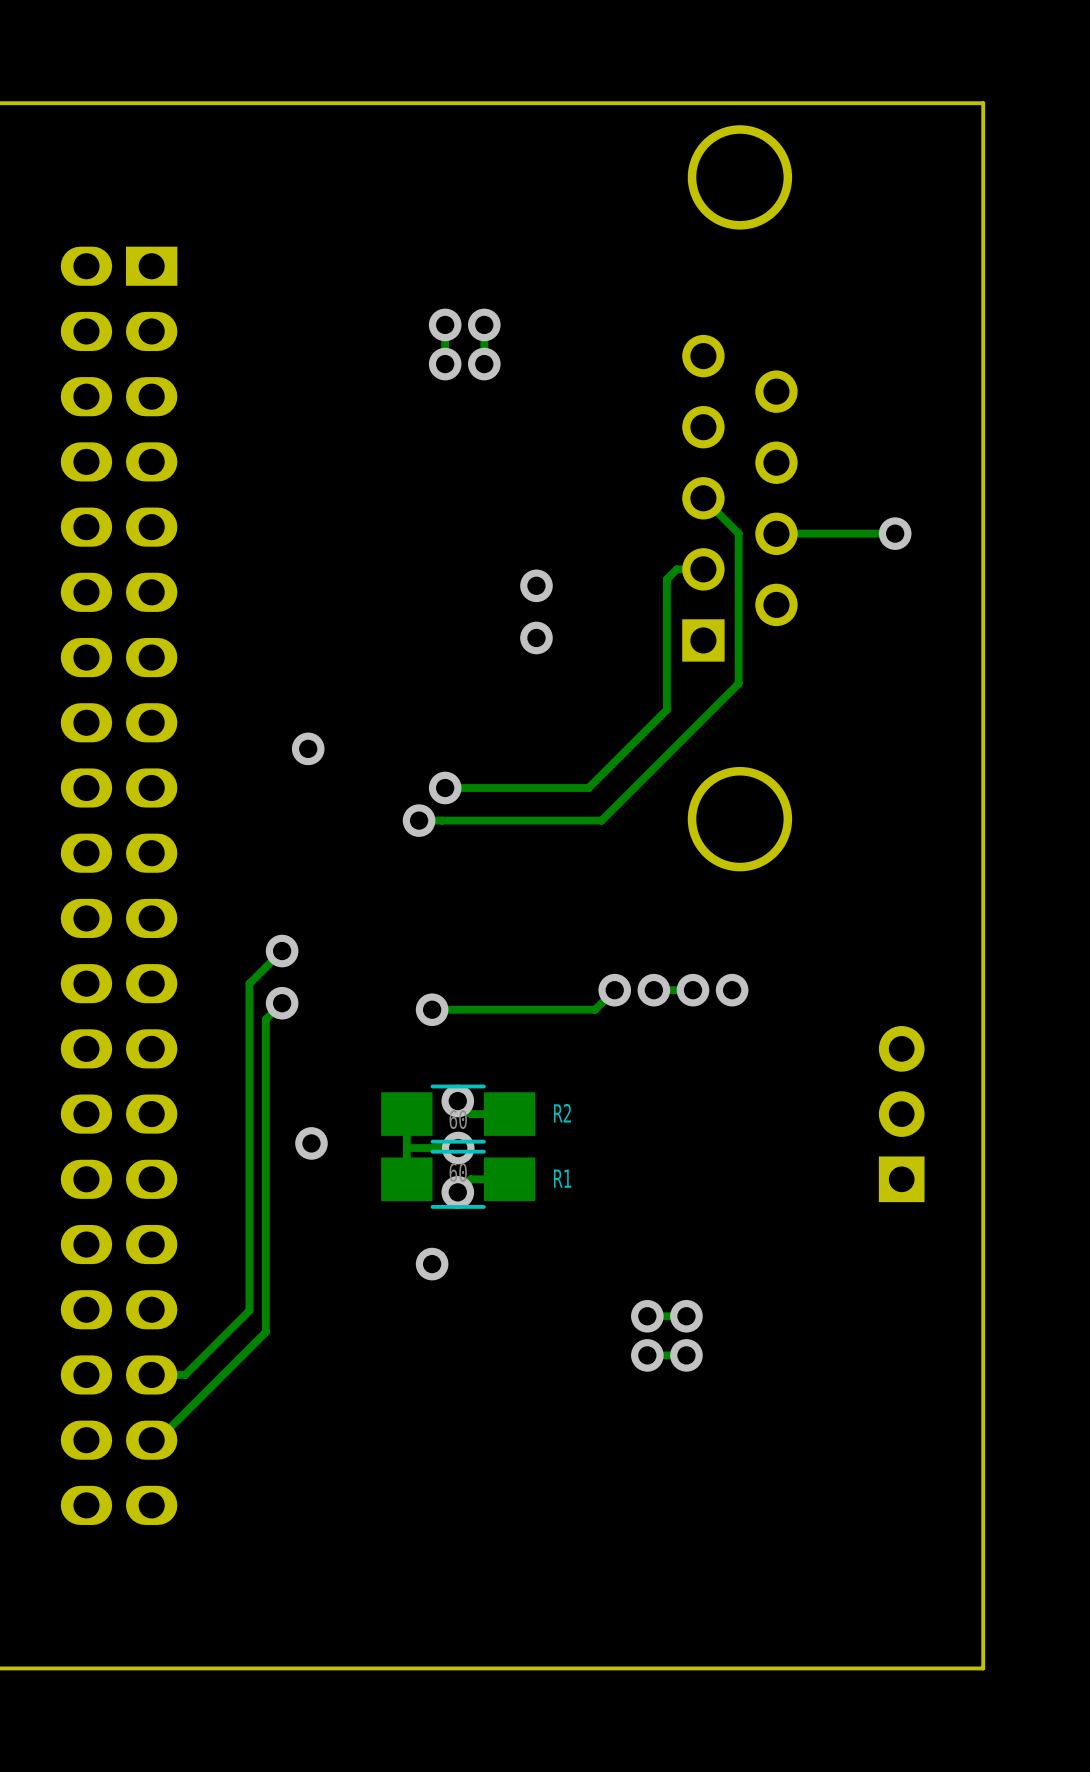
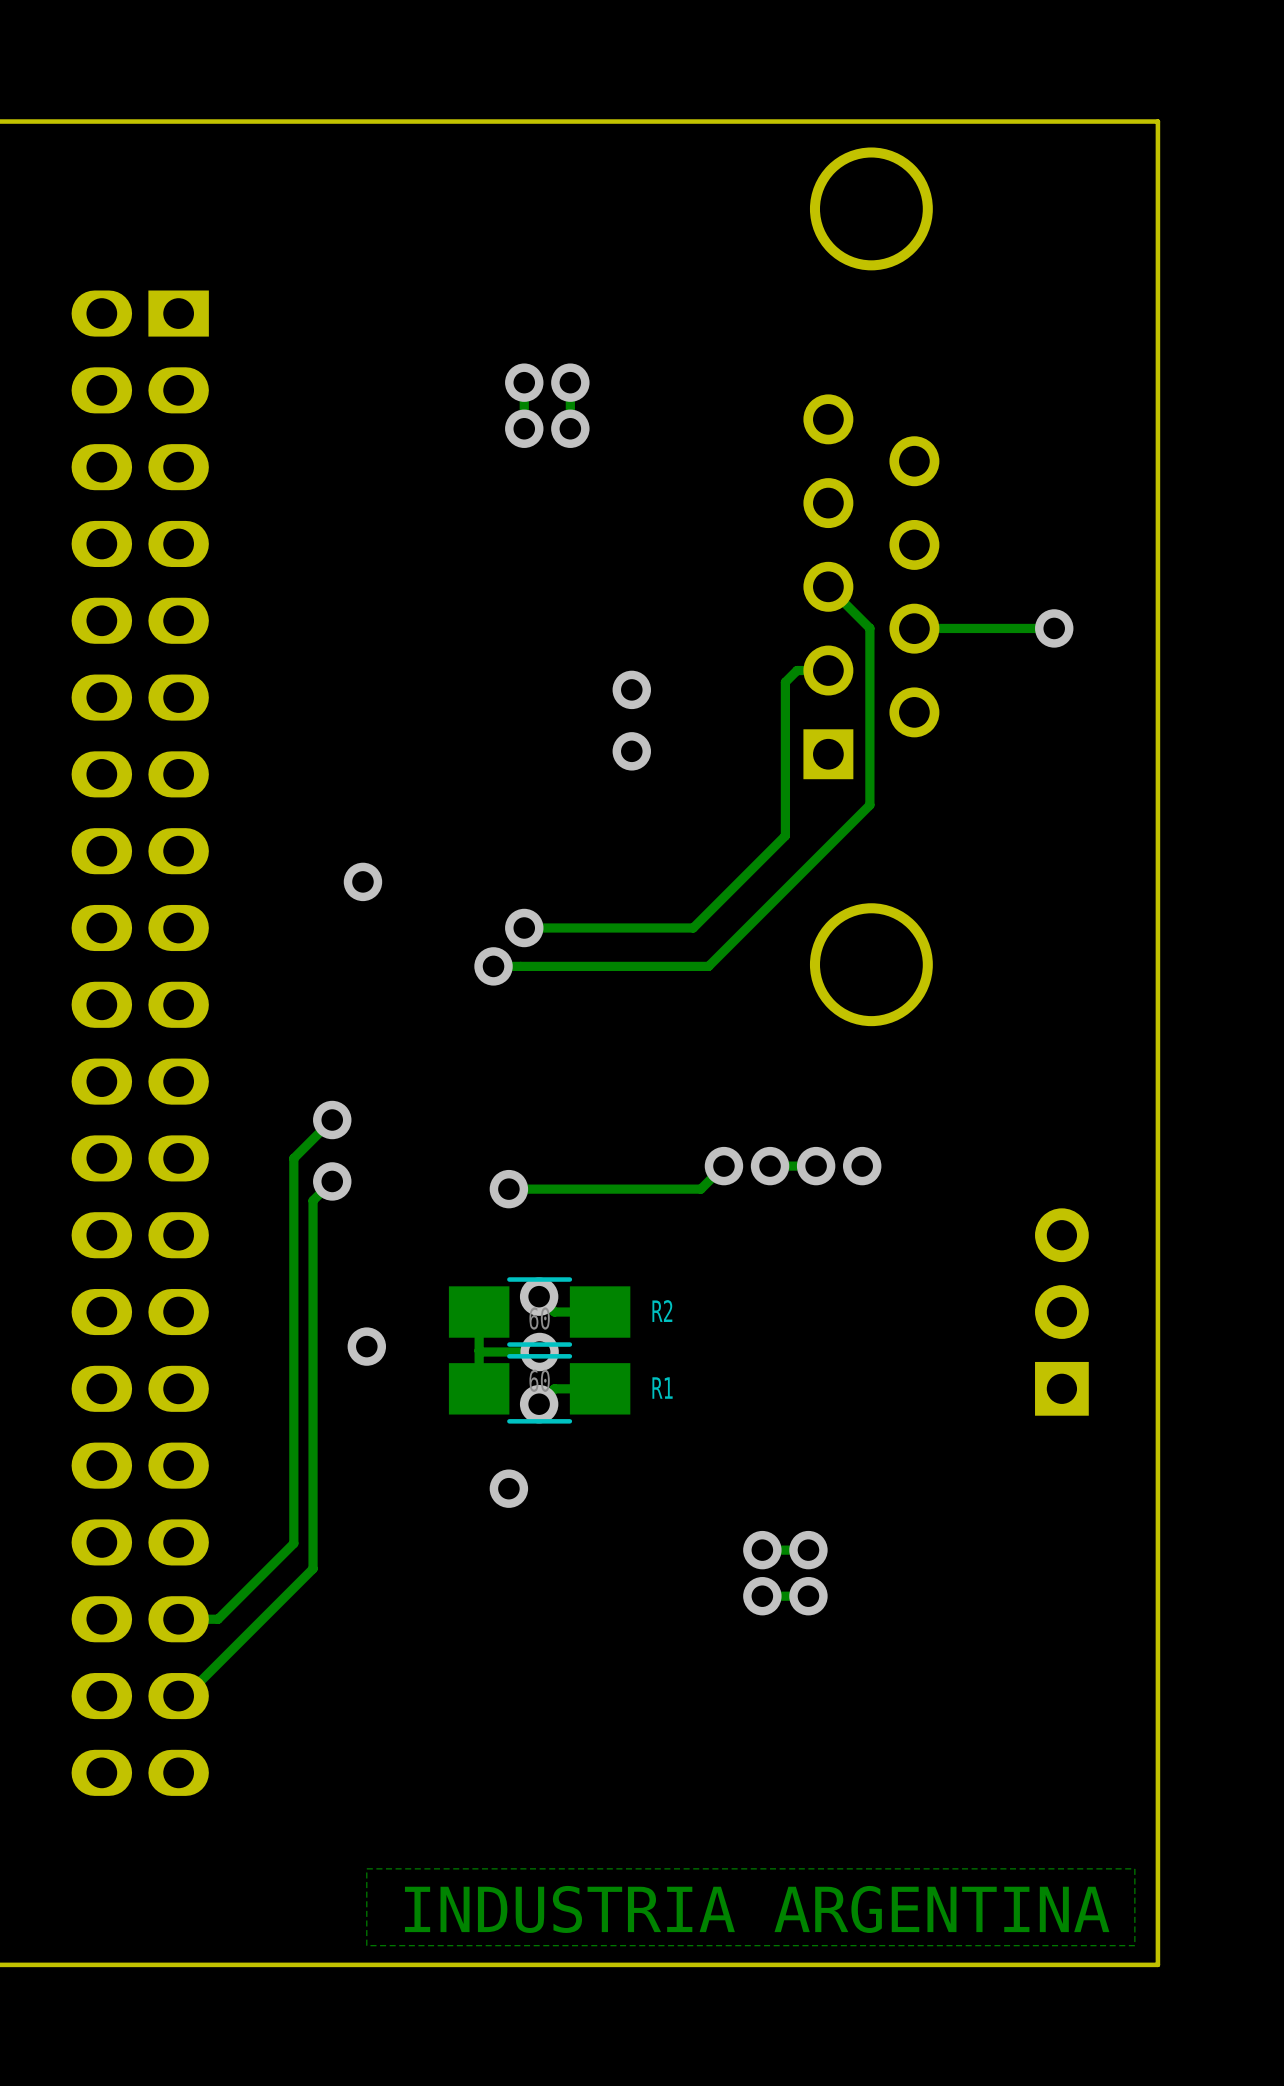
zone outline: none -> (1134, 1868) (1134, 1945) (366, 1945) (366, 1868) (1134, 1868)
text: none -> INDUSTRIA ARGENTINA (757, 1909)

